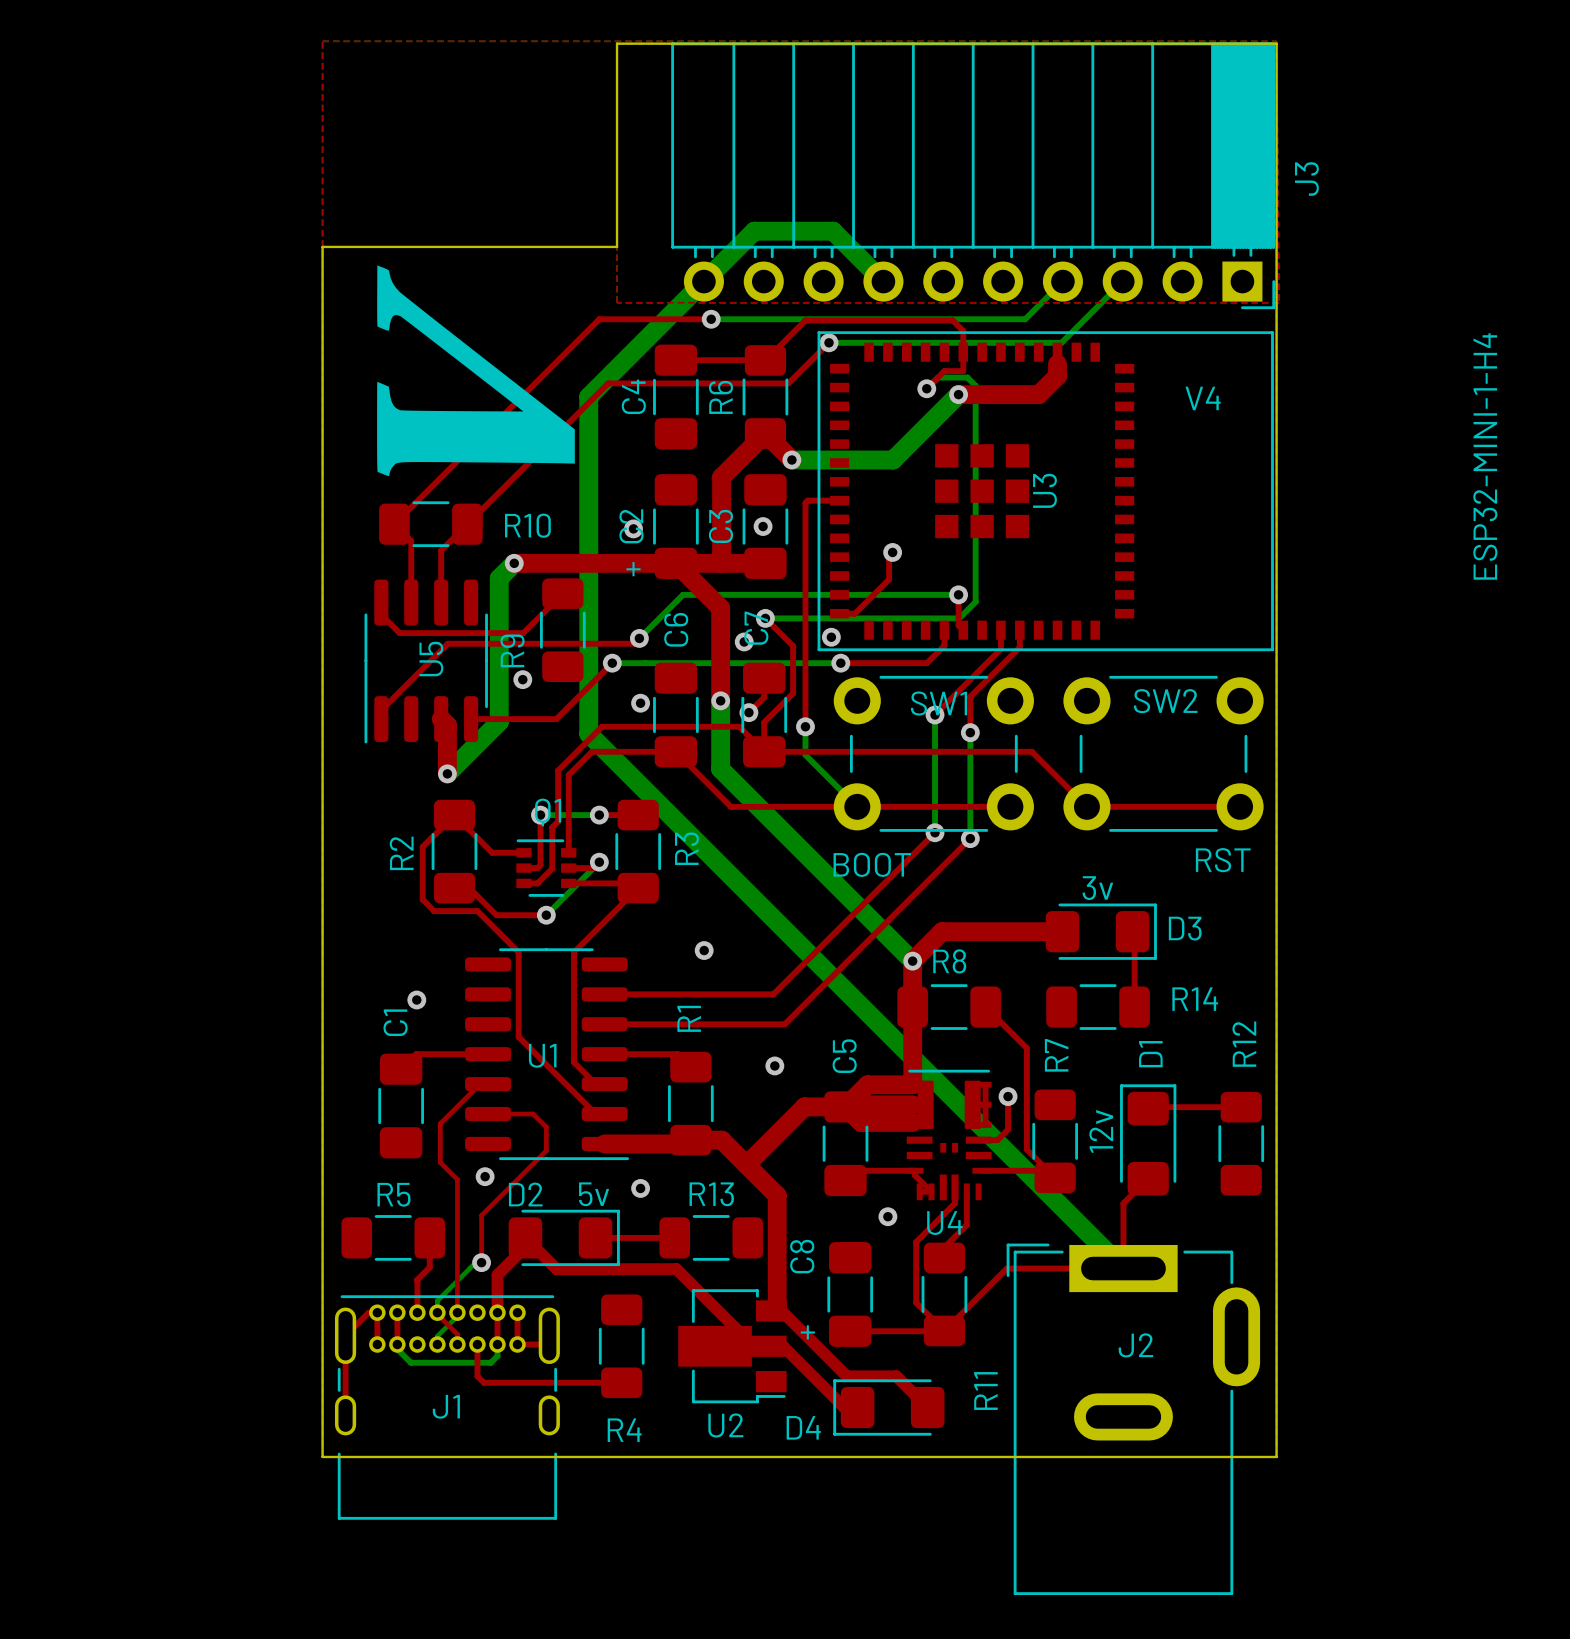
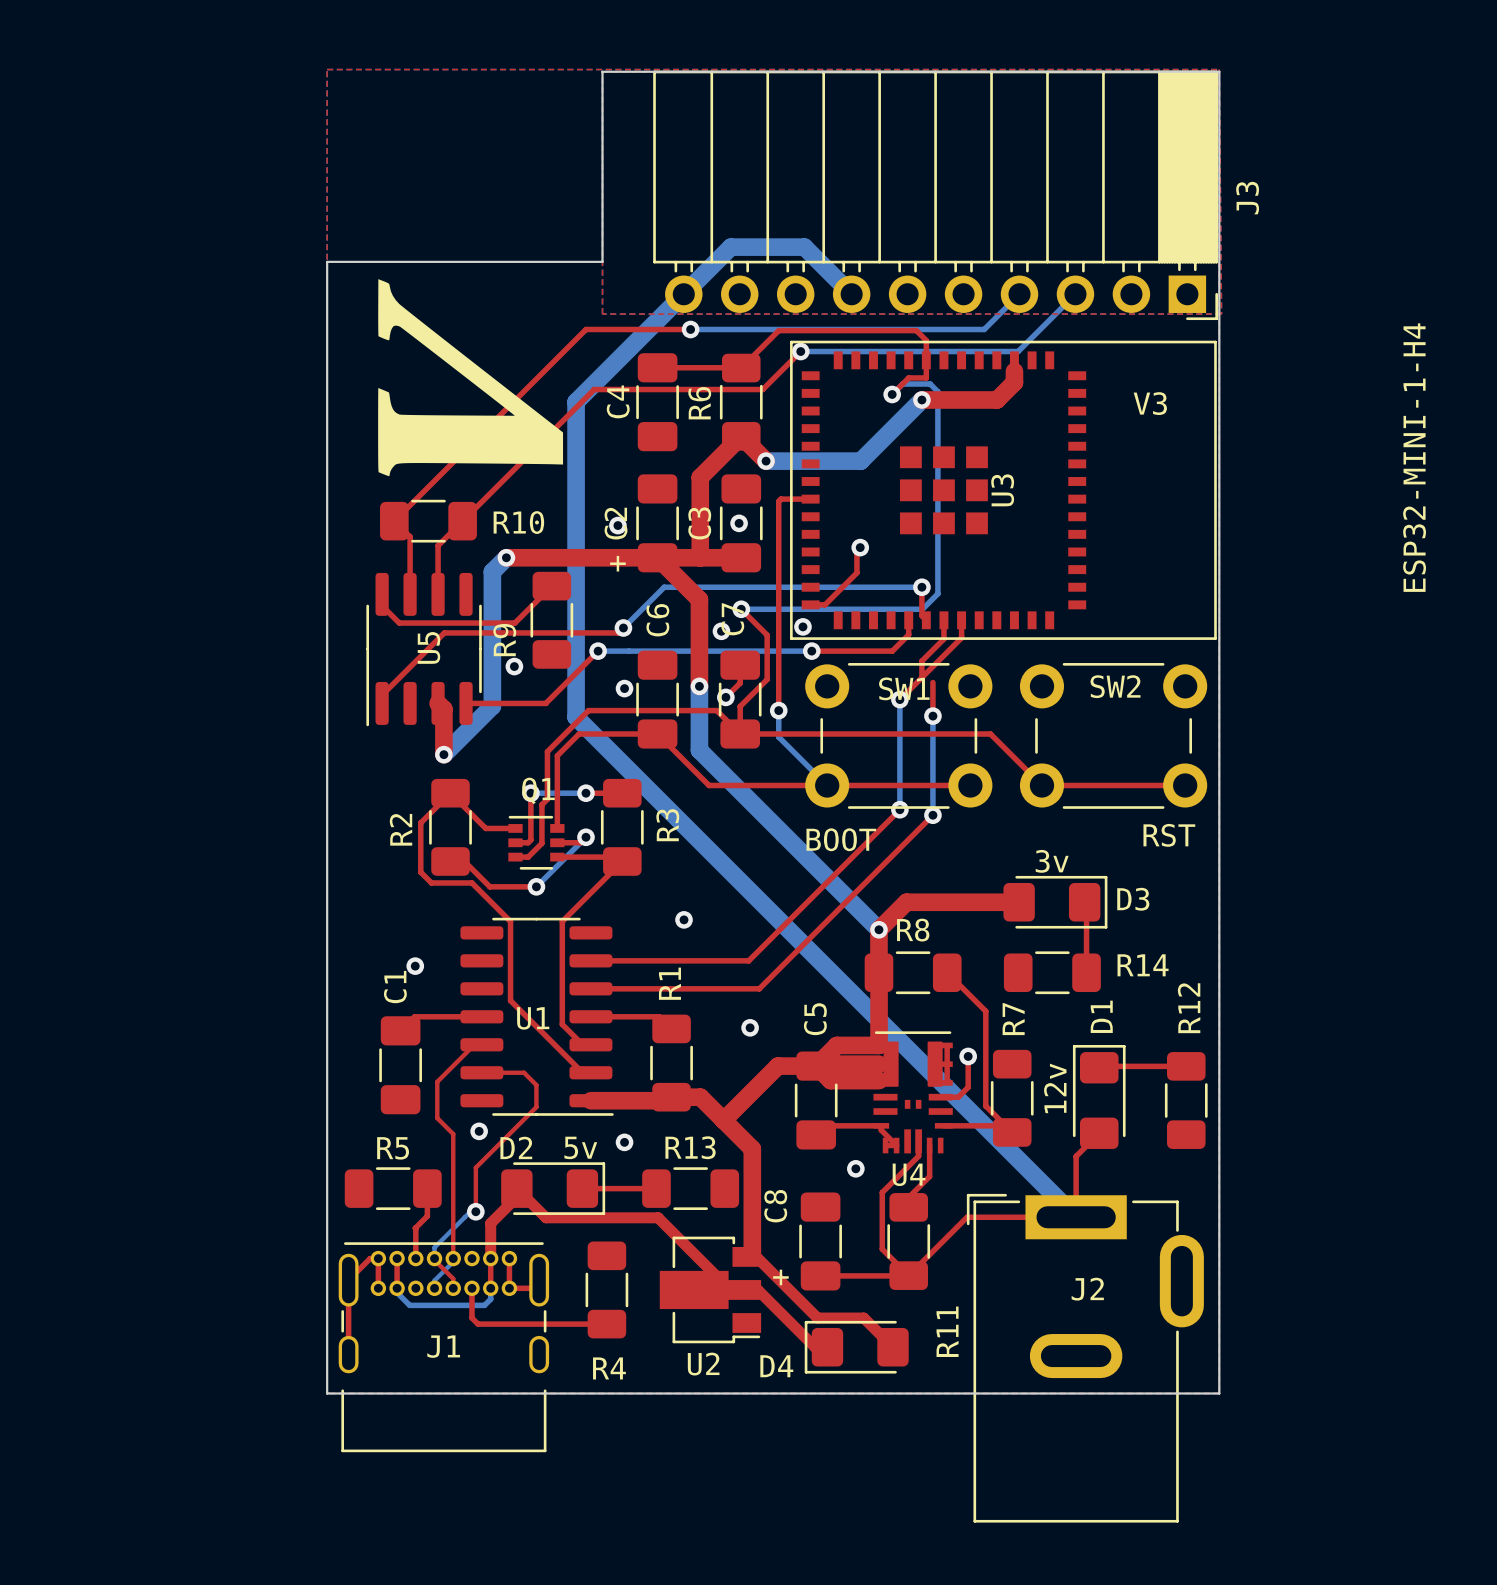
text: V4 (1203, 398) -> V3 (1150, 403)
top track: none -> (943, 620) (943, 639) (921, 661) (921, 677)
top track: (1019, 630) (1019, 647) (970, 696) -> none

